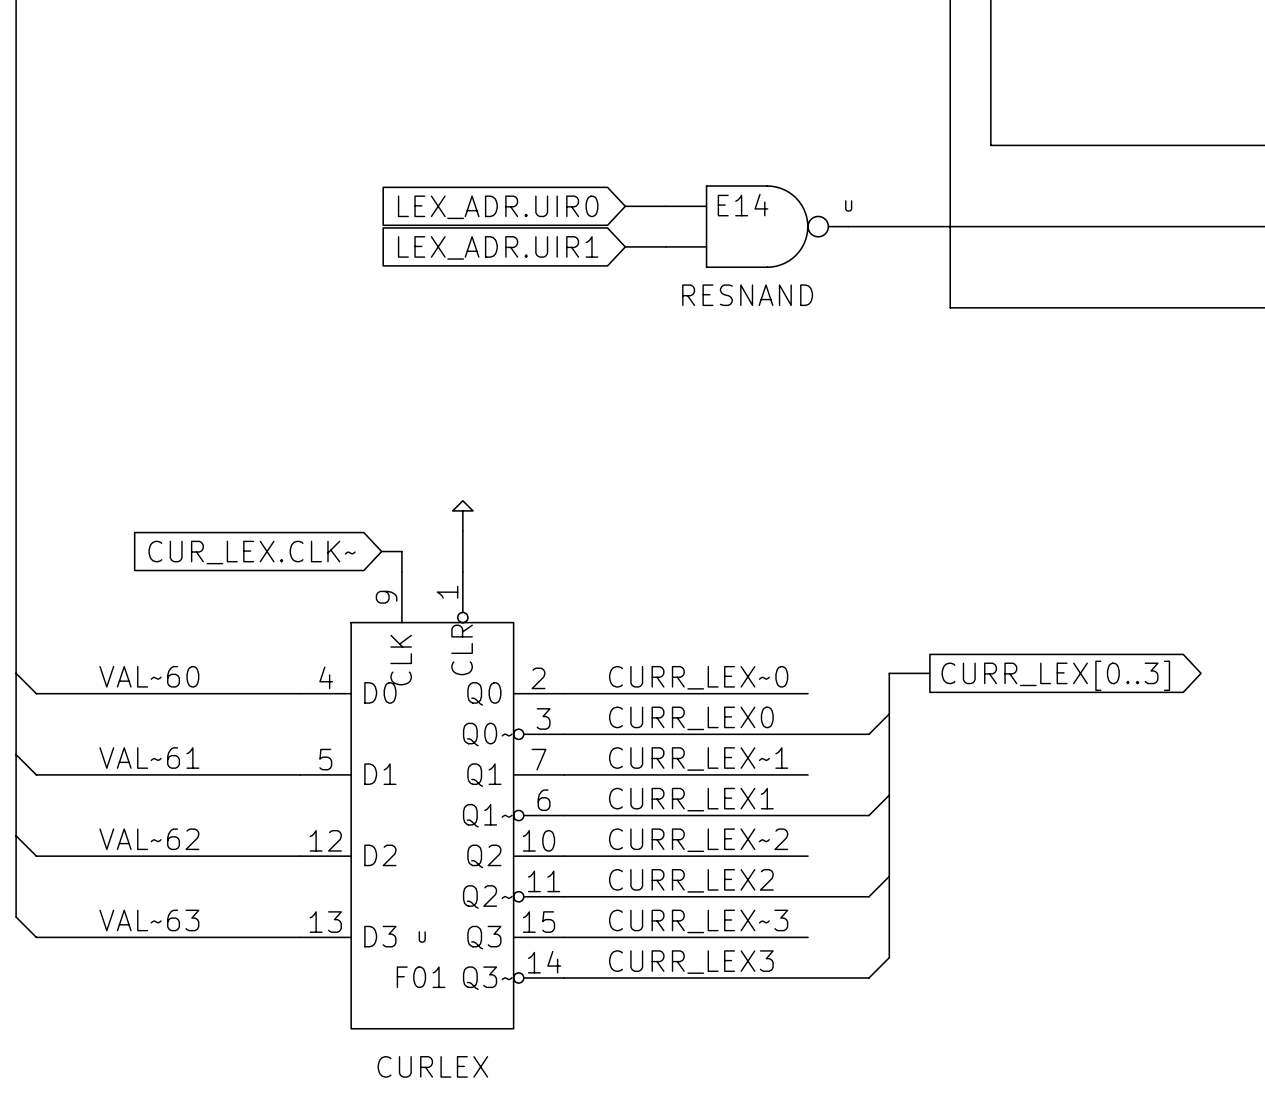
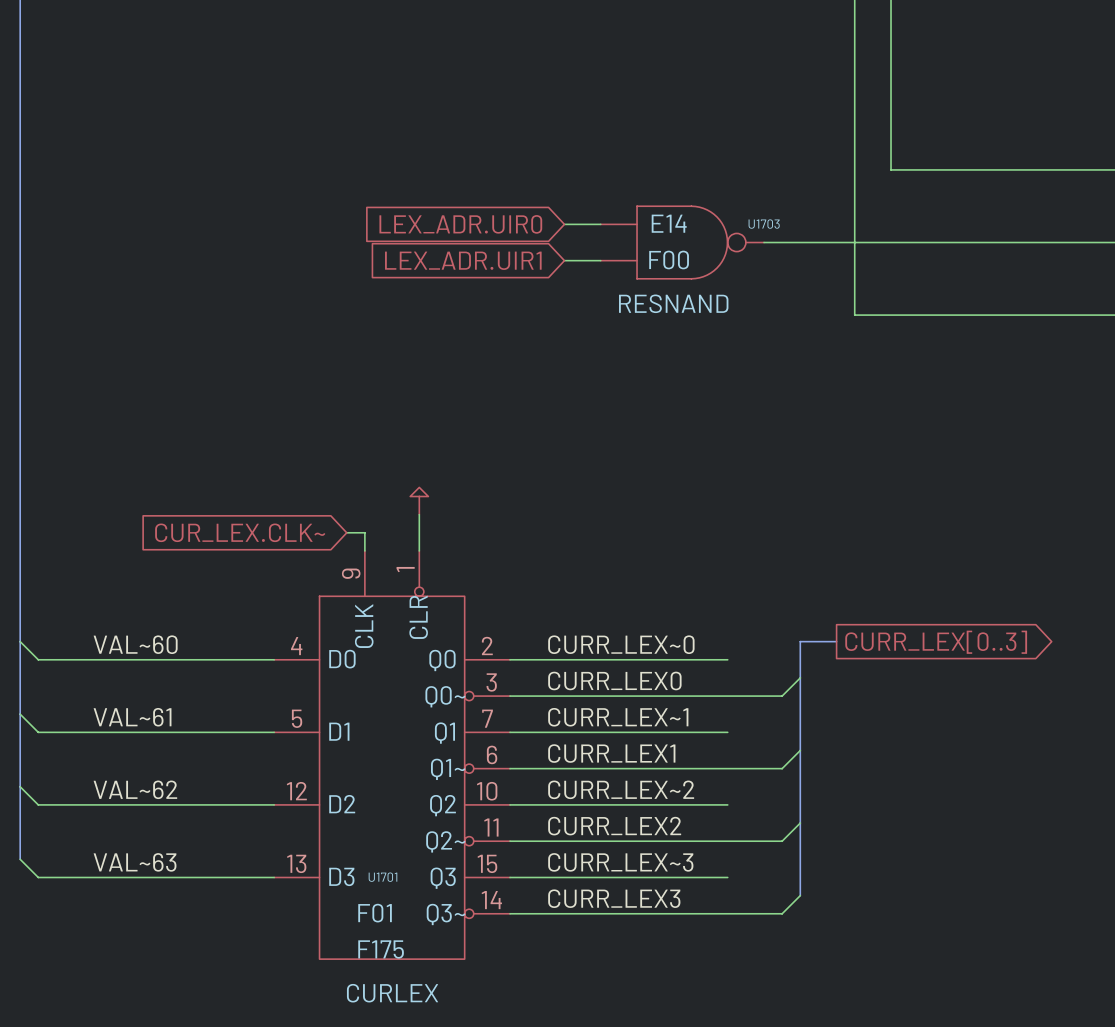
U name: U (848, 205) -> U1703 (764, 224)
U value: none -> F00 (669, 259)
U name: U (422, 937) -> U1701 (382, 877)
U value: none -> F175 (381, 949)

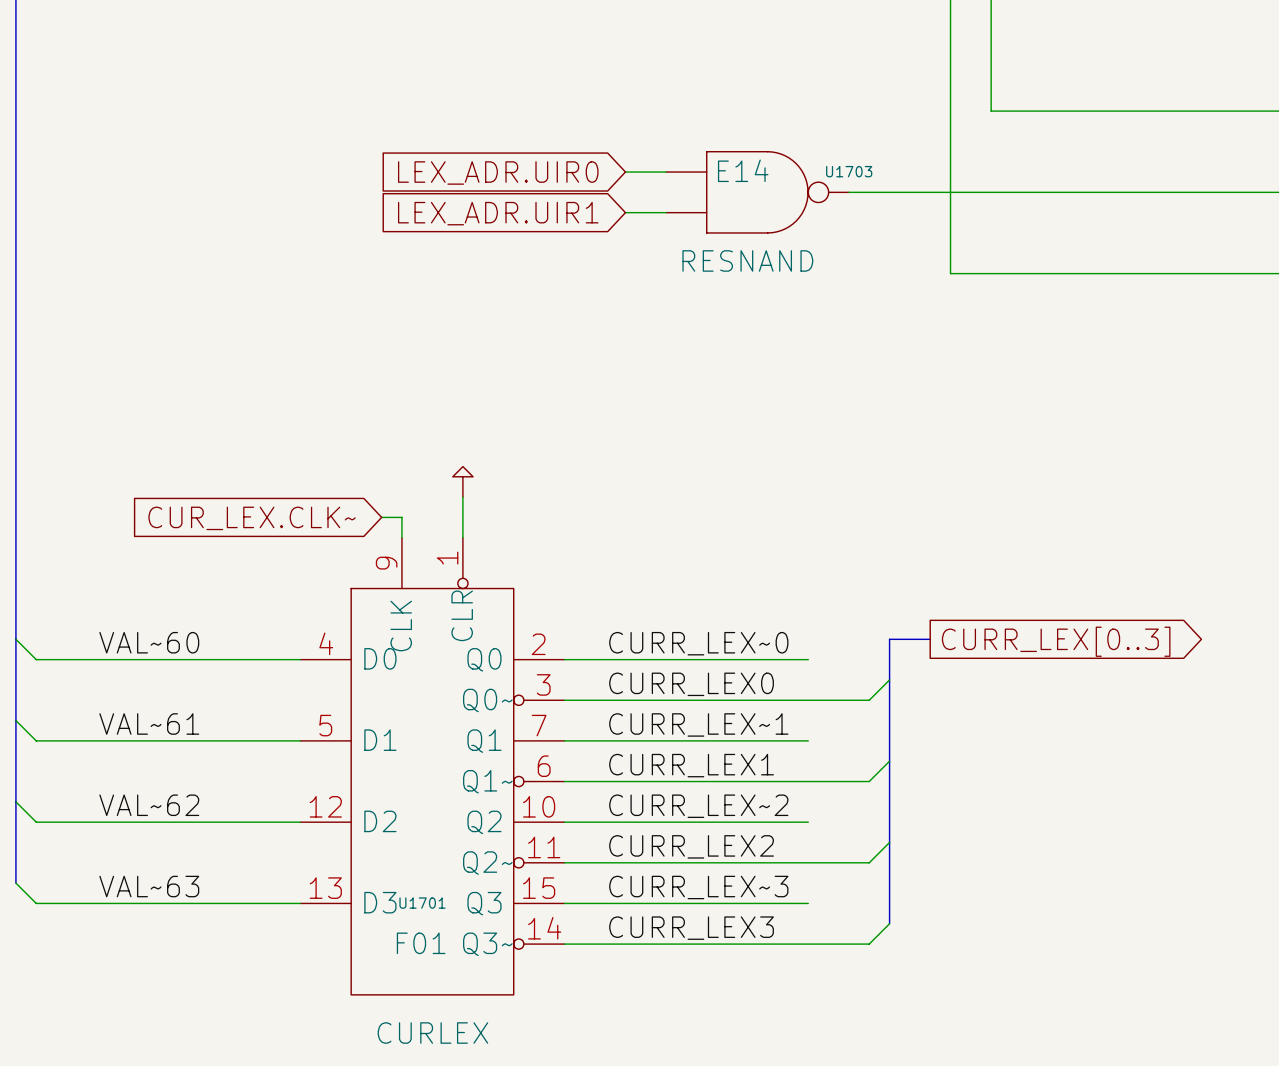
U1703 value: F00 (669, 259) -> none
U1701 value: F175 (381, 949) -> none

